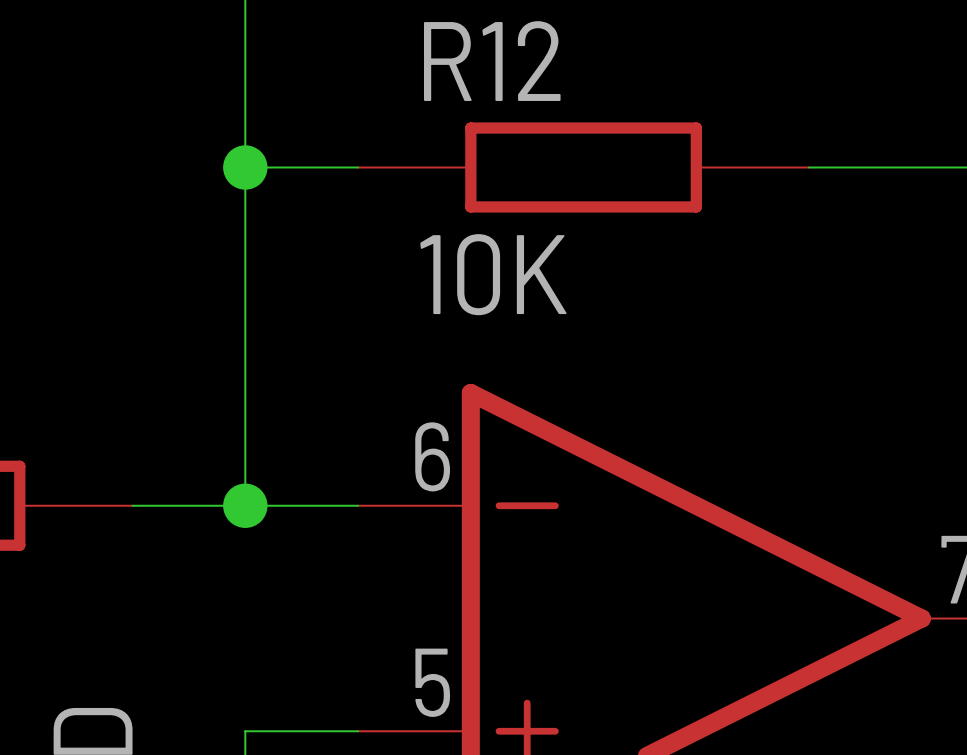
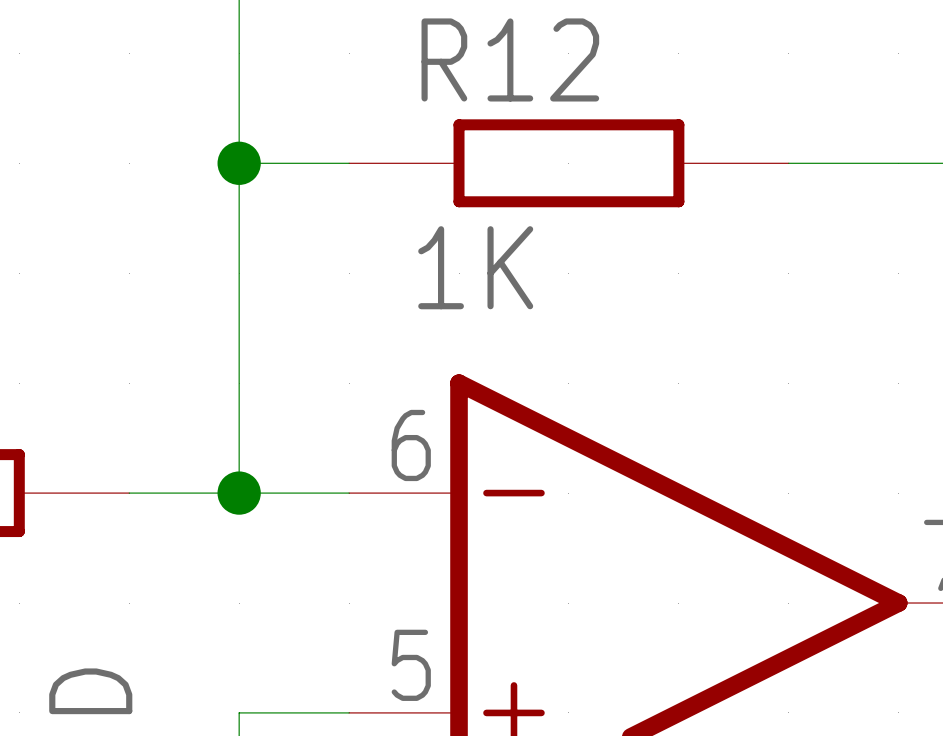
R12 value: 10K (493, 274) -> 1K (475, 267)

